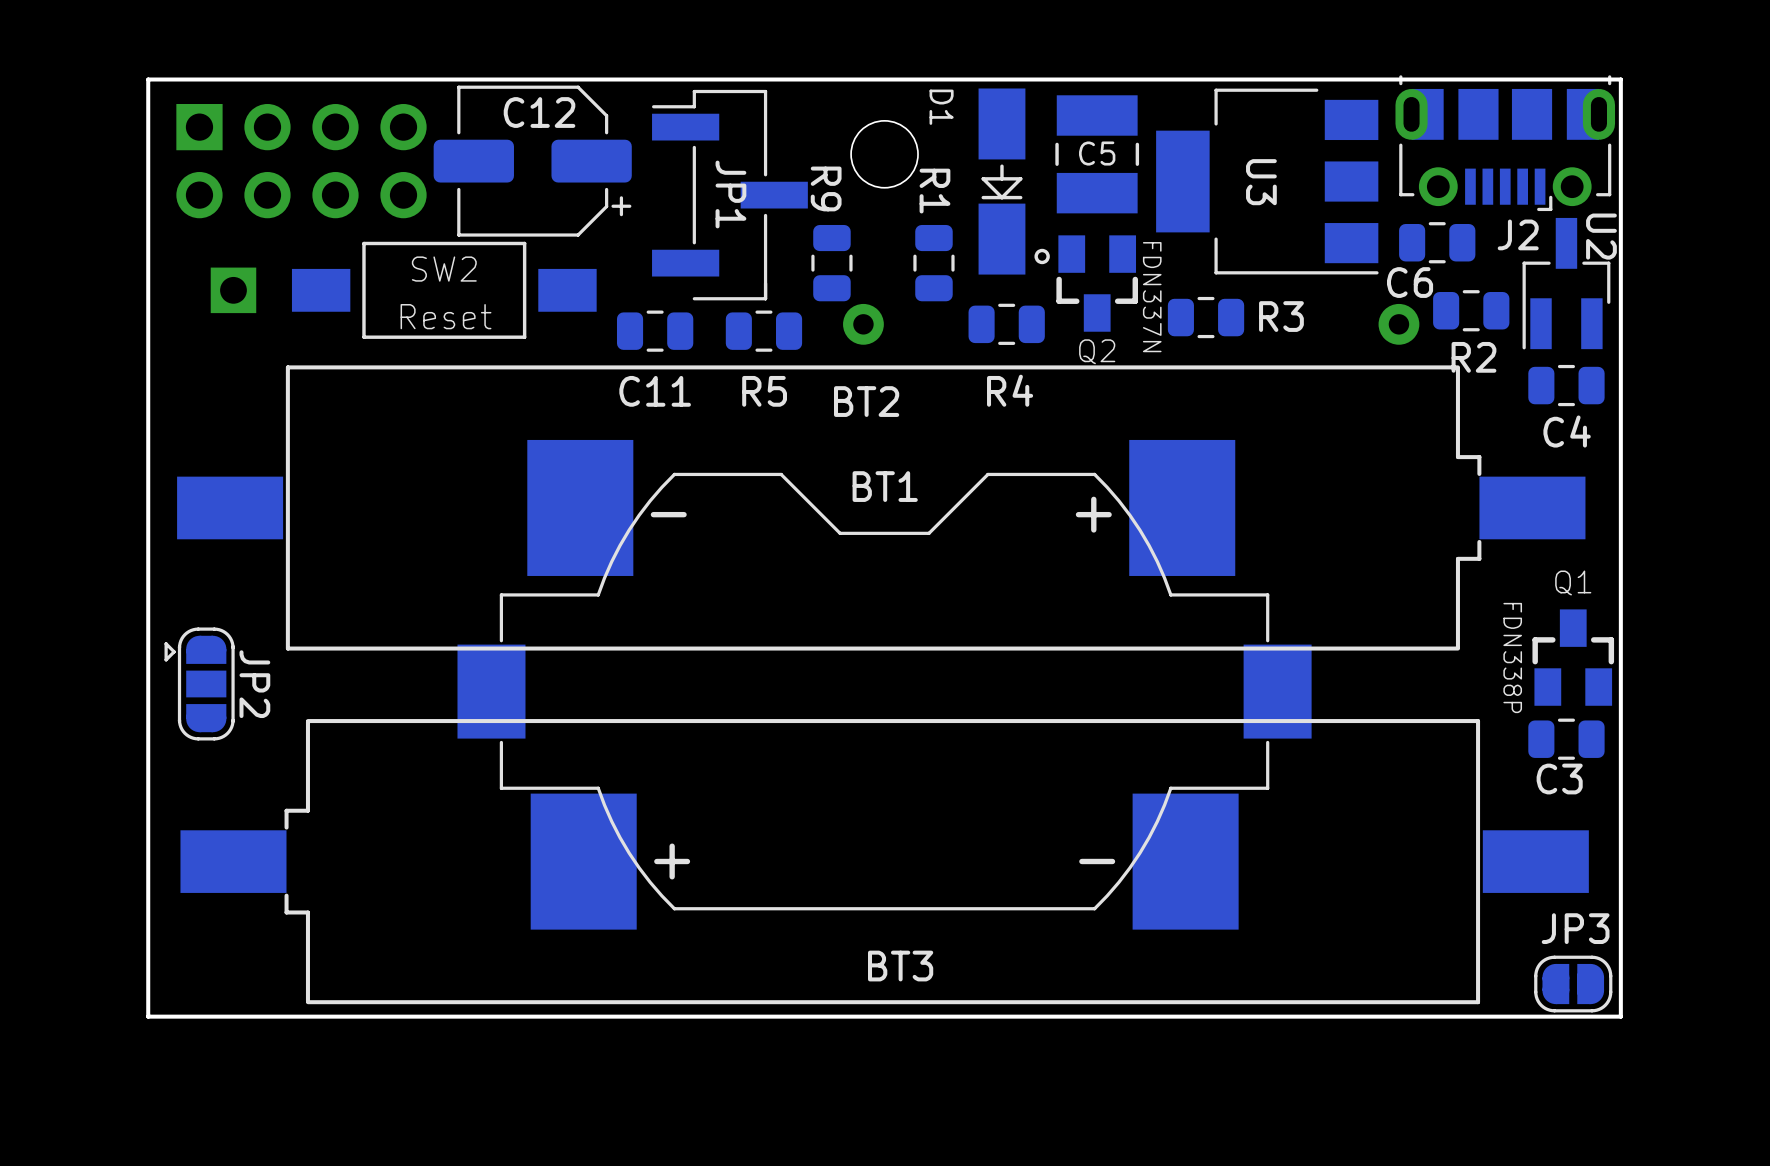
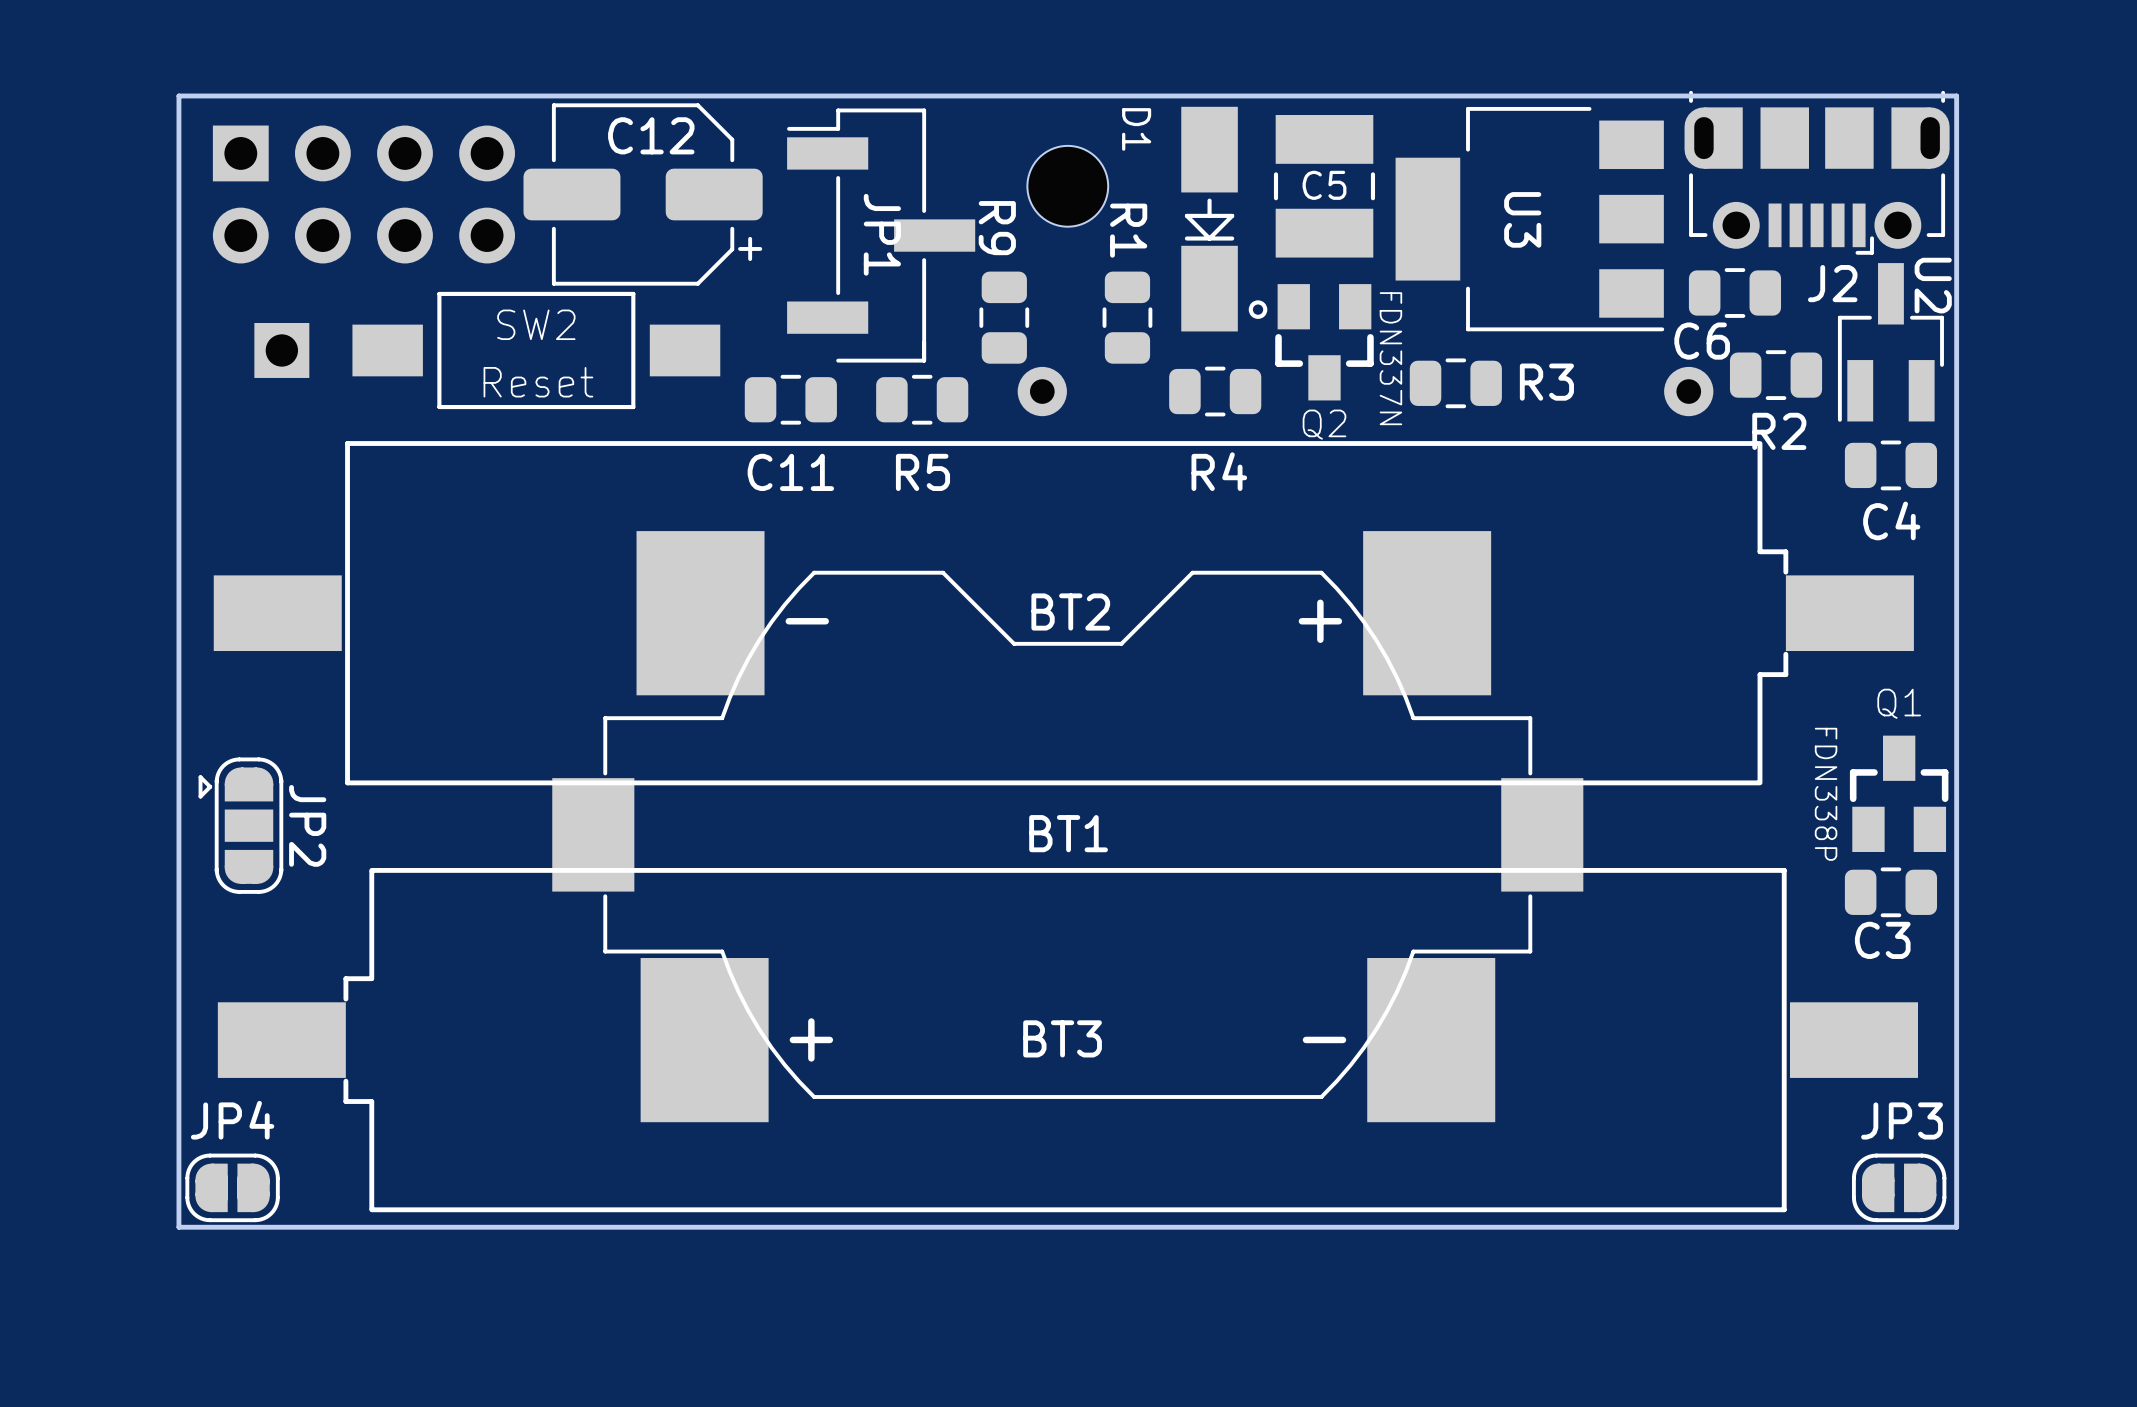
BT2 name position: BT2 (866, 401) -> BT2 (1070, 611)
BT1 name position: BT1 (885, 486) -> BT1 (1068, 833)
BT3 name position: BT3 (900, 966) -> BT3 (1062, 1038)
JP4: none -> (232, 1187)

